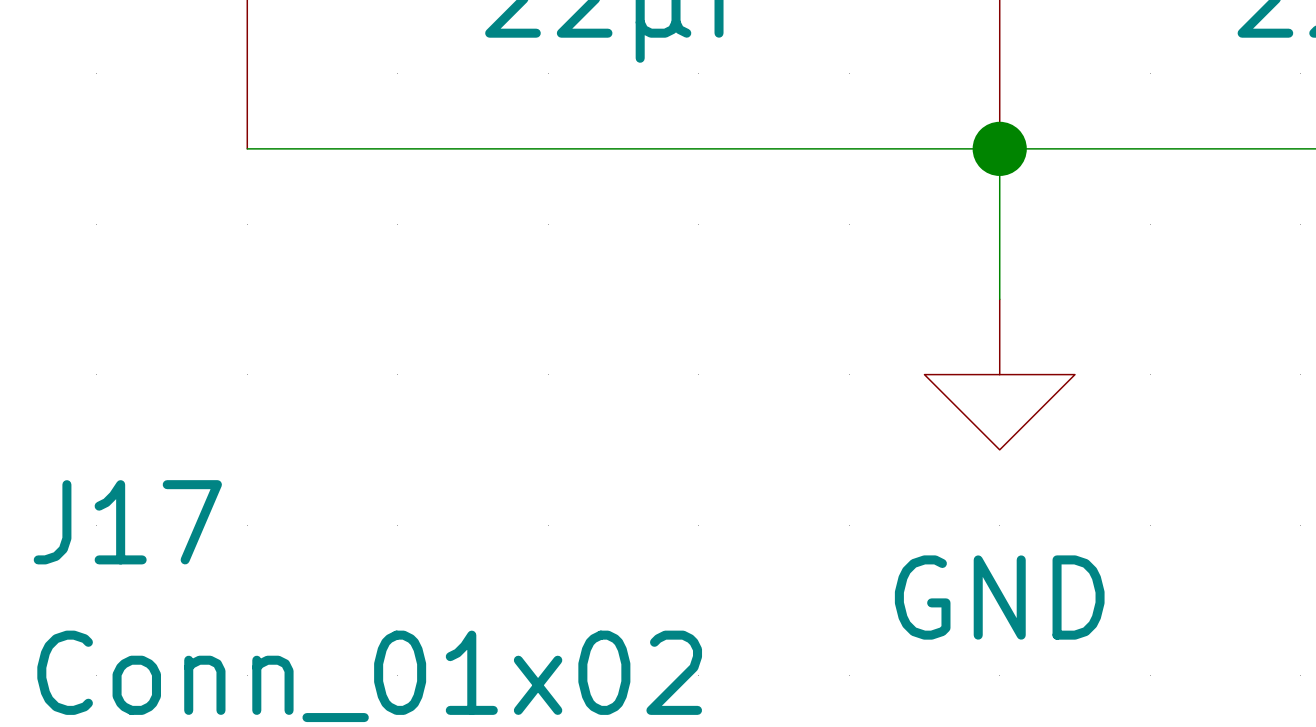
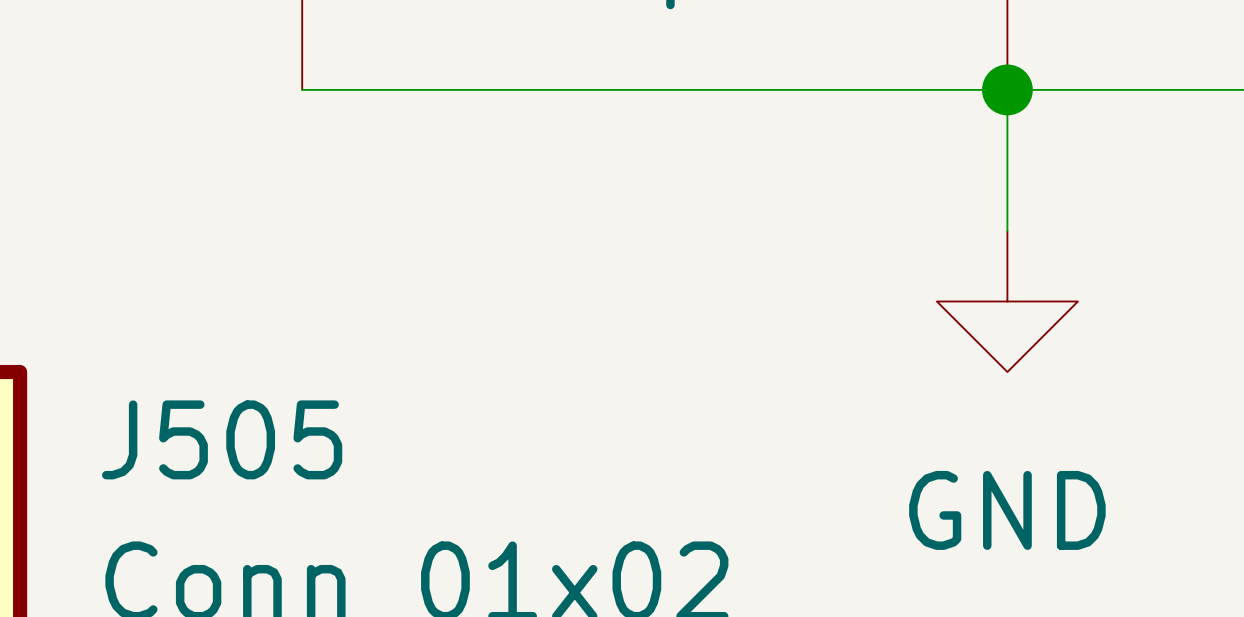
J17 name: J17 (127, 522) -> J505 (222, 439)

